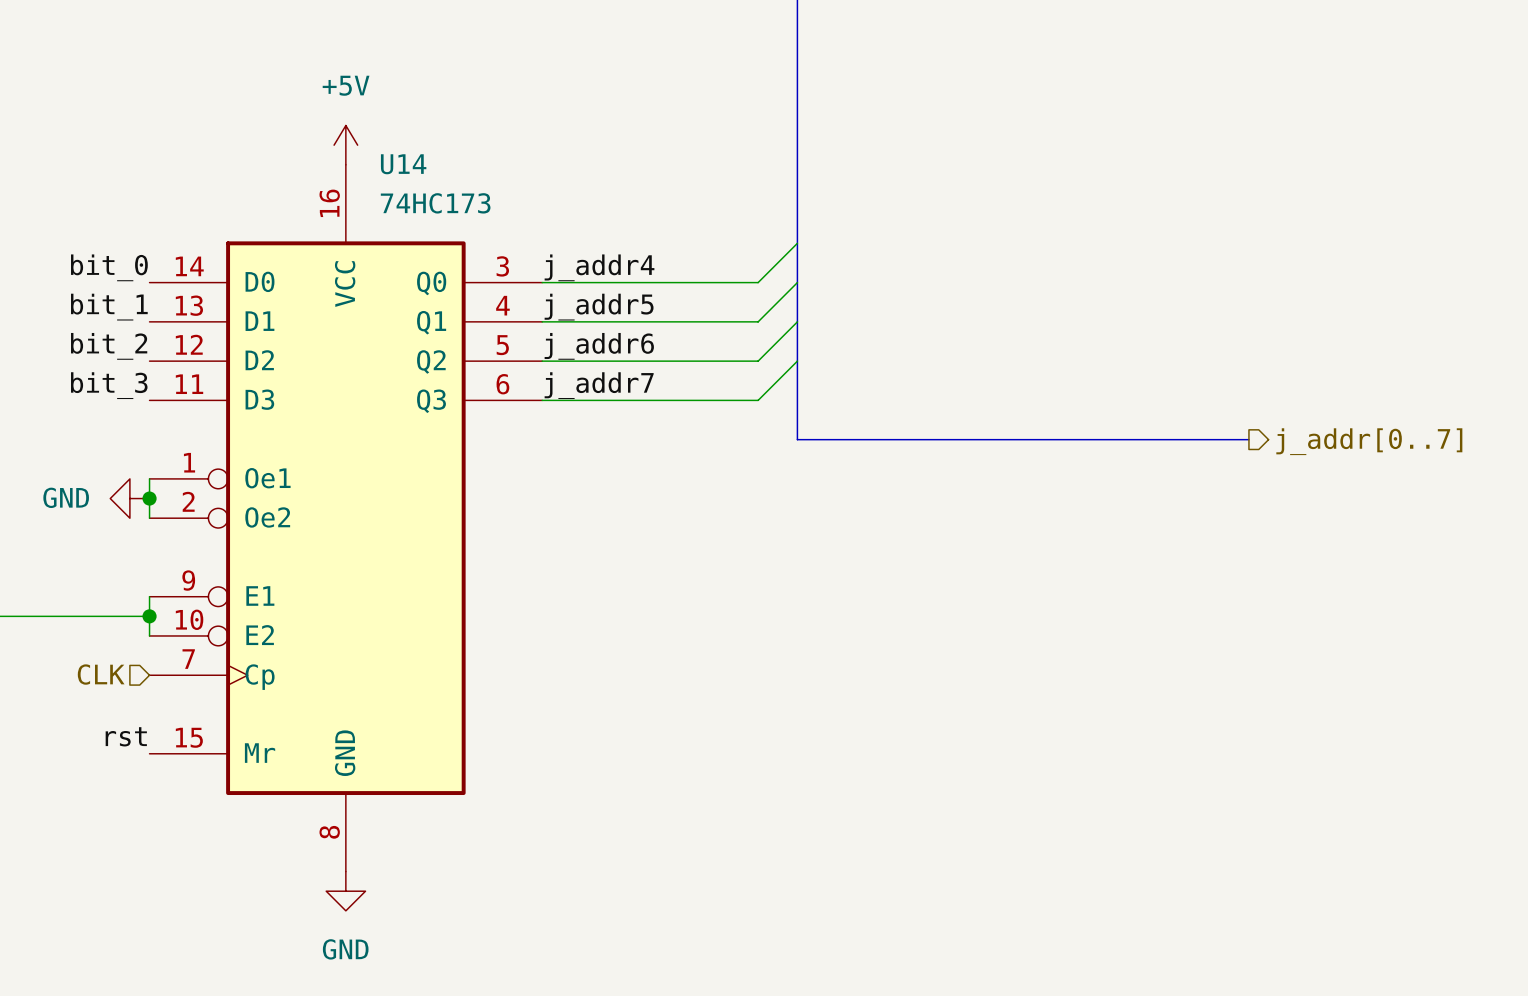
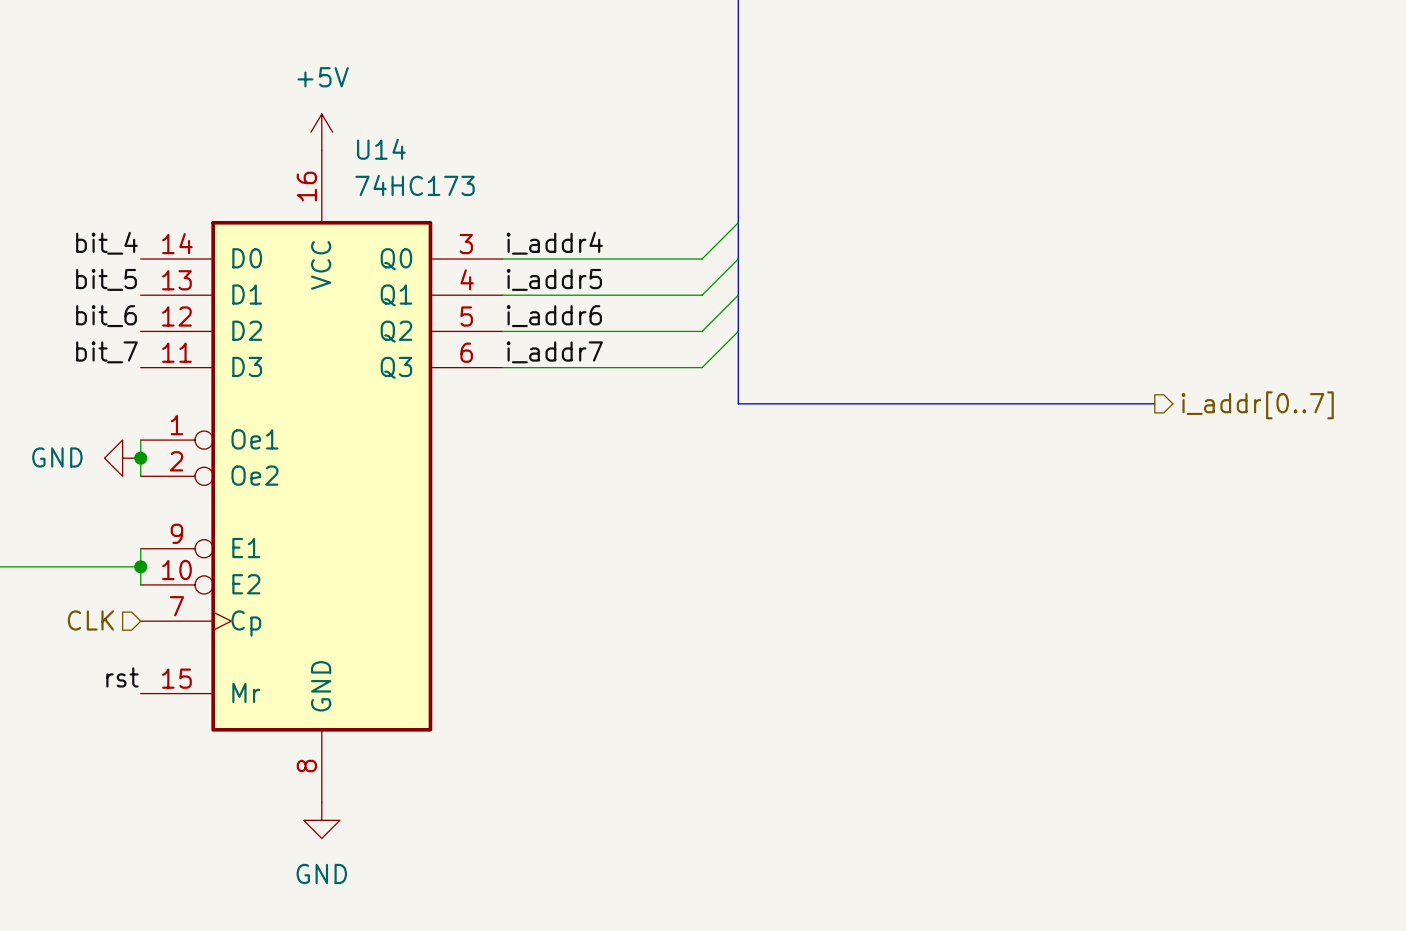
label: bit_0 (109, 267) -> bit_4 (106, 243)
label: j_addr4 (599, 267) -> i_addr4 (554, 243)
label: bit_1 (109, 307) -> bit_5 (106, 279)
label: j_addr5 (599, 307) -> i_addr5 (554, 279)
label: bit_2 (109, 346) -> bit_6 (106, 316)
label: j_addr6 (599, 346) -> i_addr6 (554, 316)
label: bit_3 (109, 385) -> bit_7 (106, 352)
label: j_addr7 (599, 385) -> i_addr7 (554, 352)
hierarchical label: j_addr[0..7] (1369, 441) -> i_addr[0..7] (1257, 405)

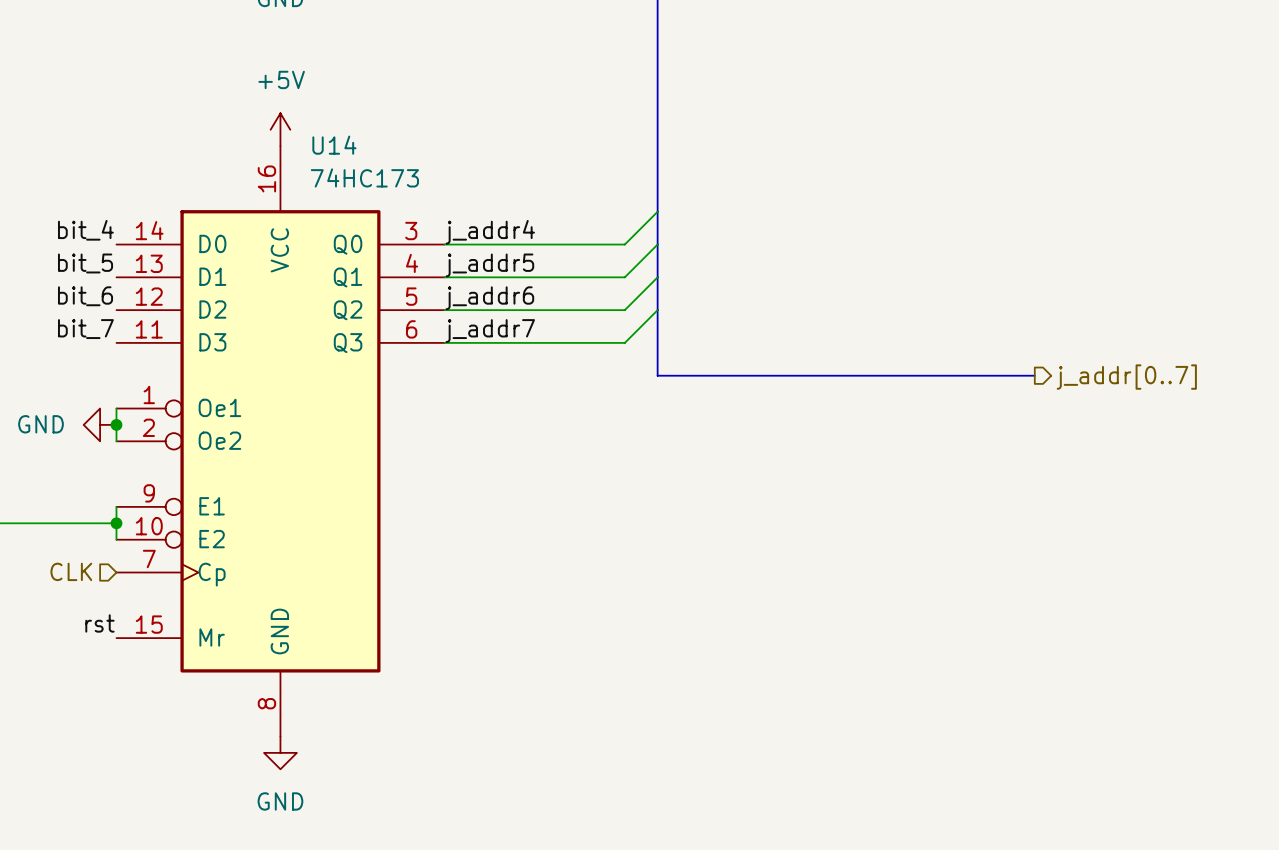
label: i_addr4 (554, 243) -> j_addr4 (490, 232)
label: i_addr5 (554, 279) -> j_addr5 (489, 265)
label: i_addr6 (554, 316) -> j_addr6 (489, 298)
label: i_addr7 (554, 352) -> j_addr7 (490, 331)
hierarchical label: i_addr[0..7] (1257, 405) -> j_addr[0..7] (1126, 377)

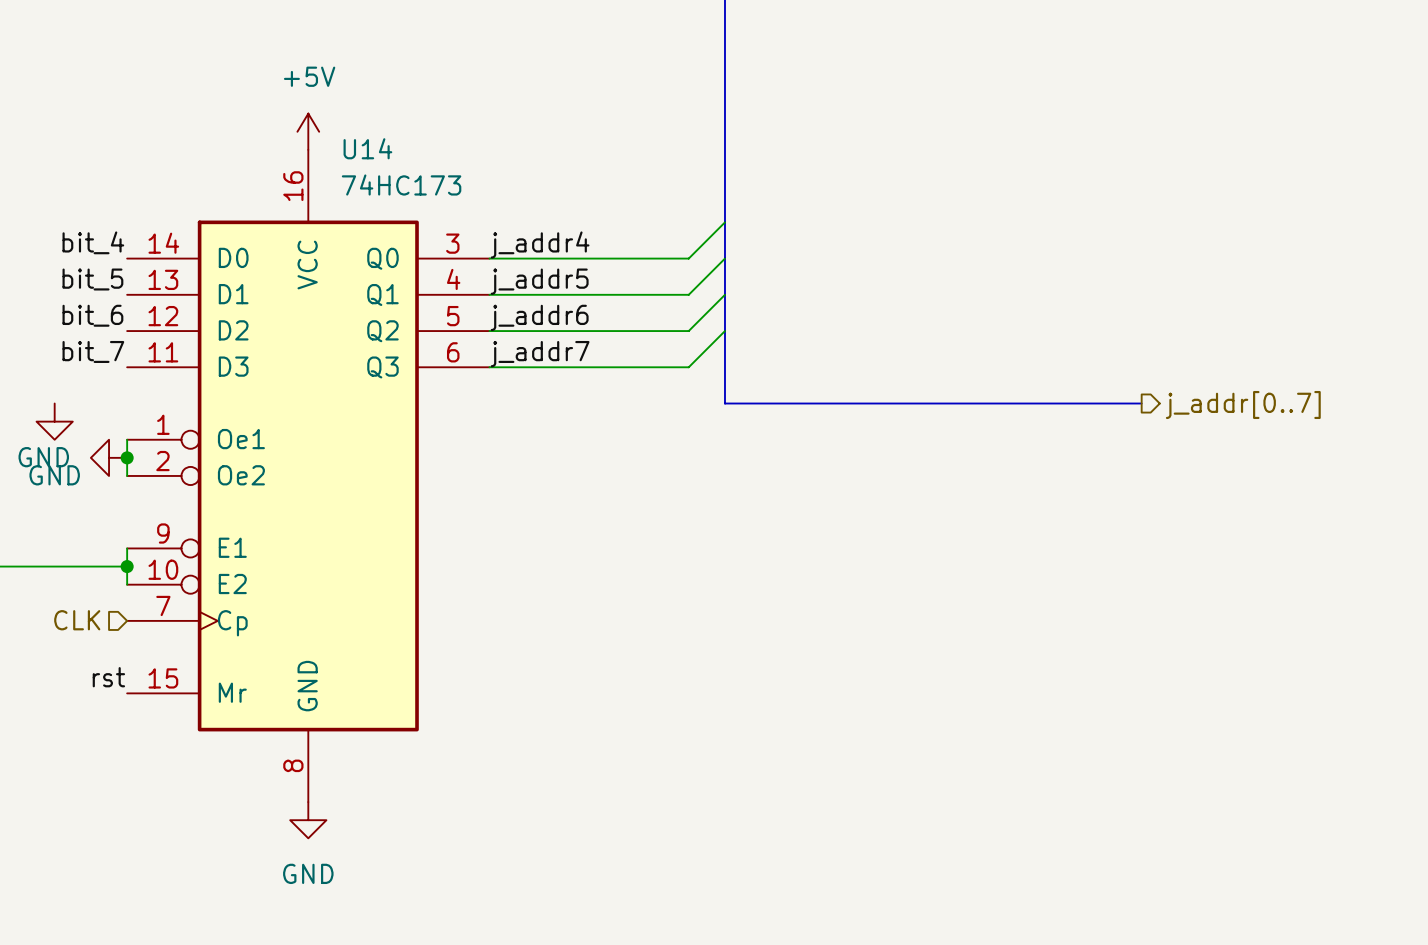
power symbol: none -> GND (54, 421)

